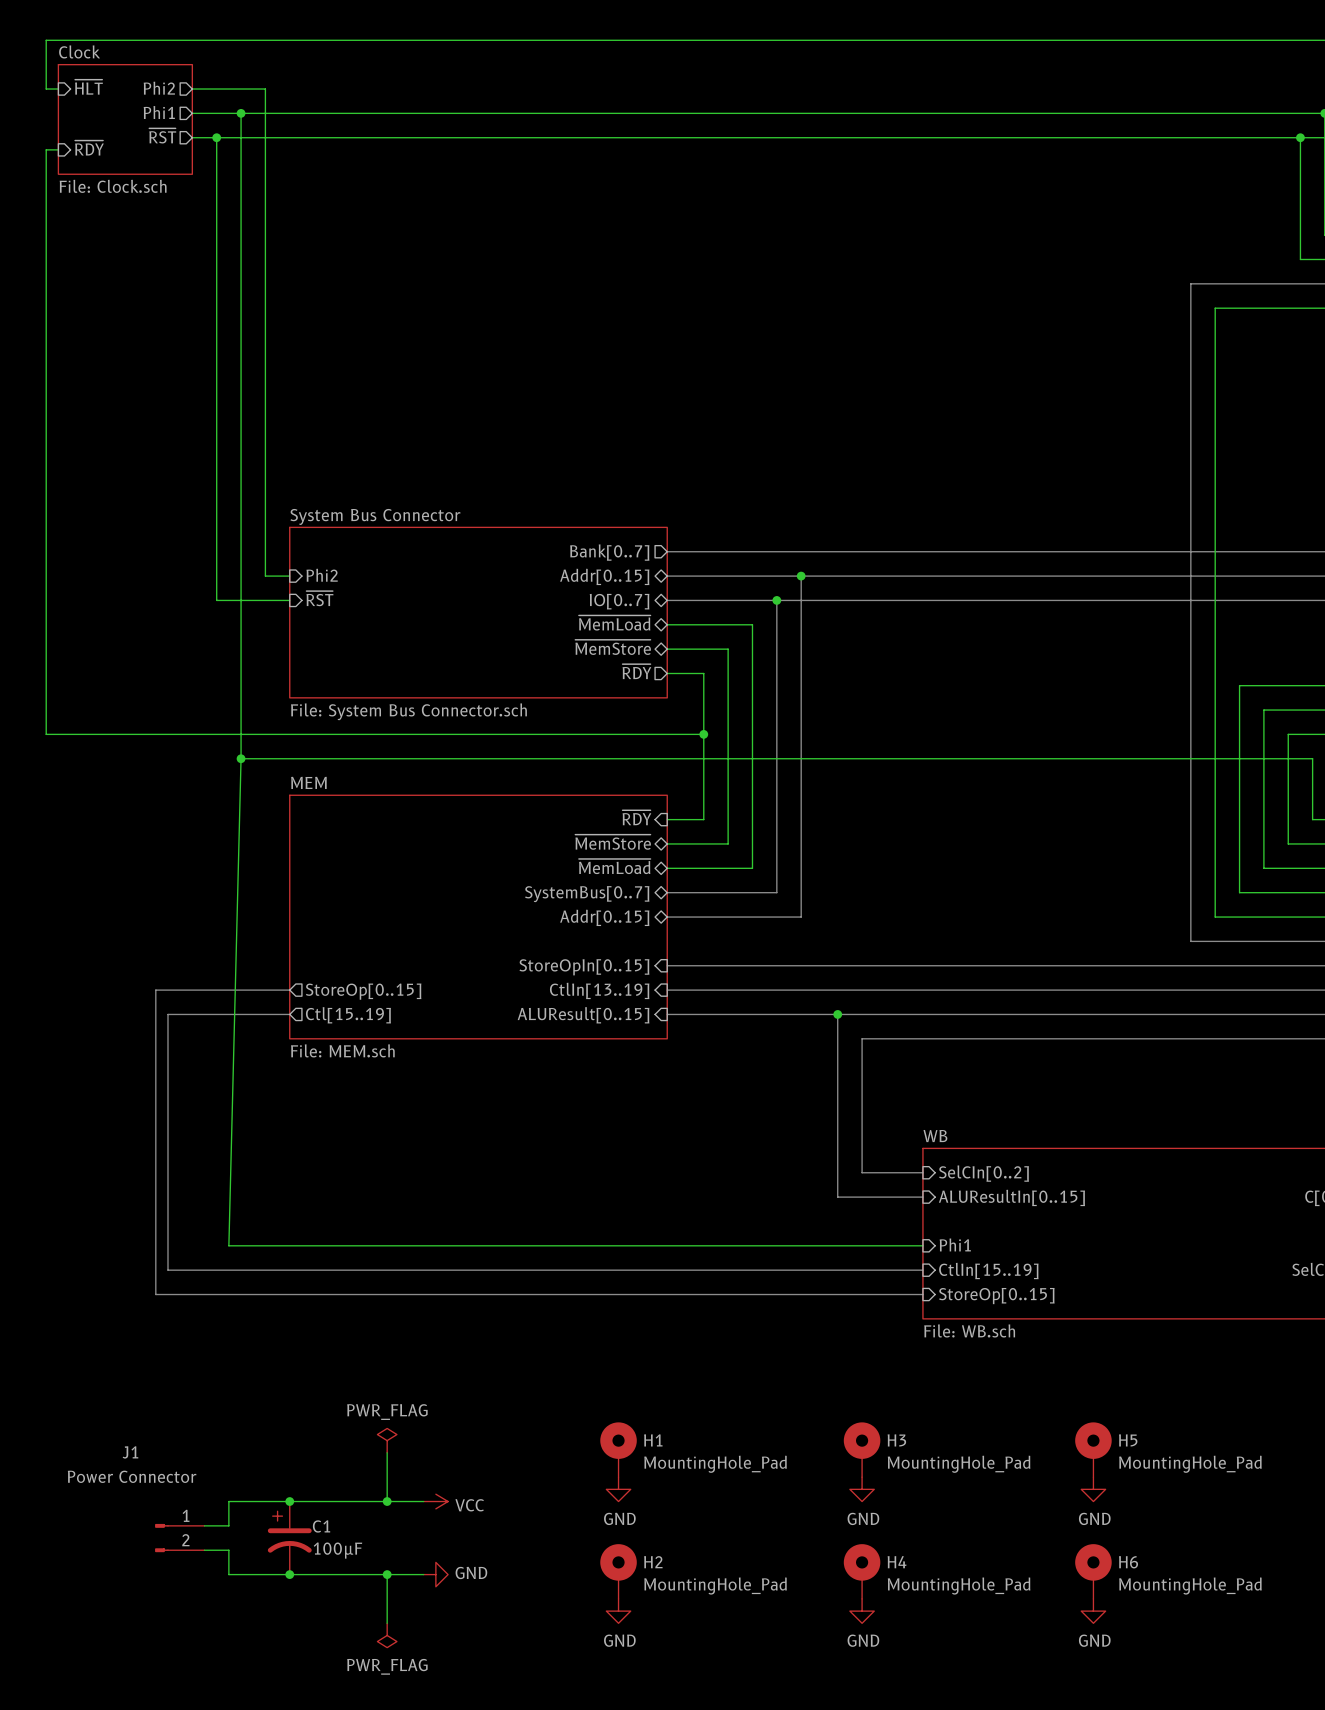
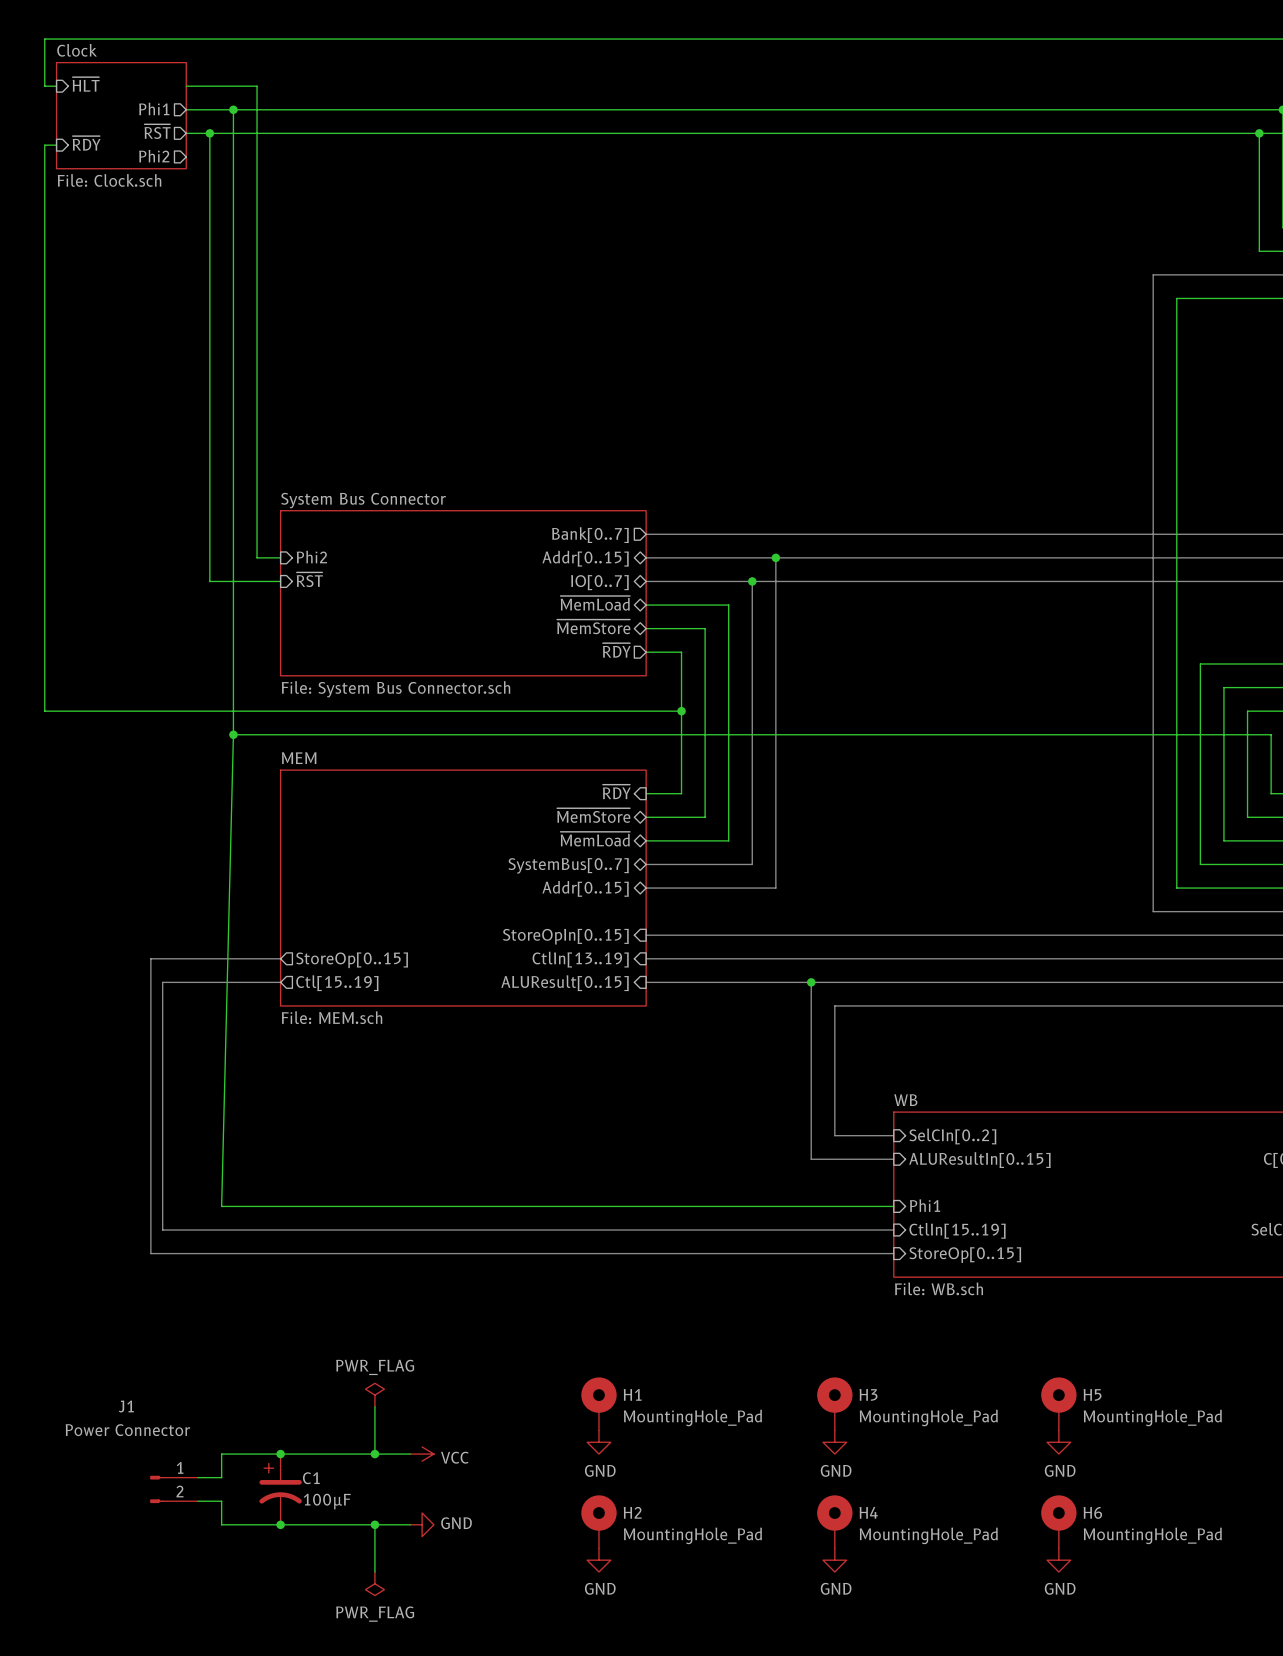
sheet pin position: Phi2 (159, 88) -> Phi2 (154, 156)

